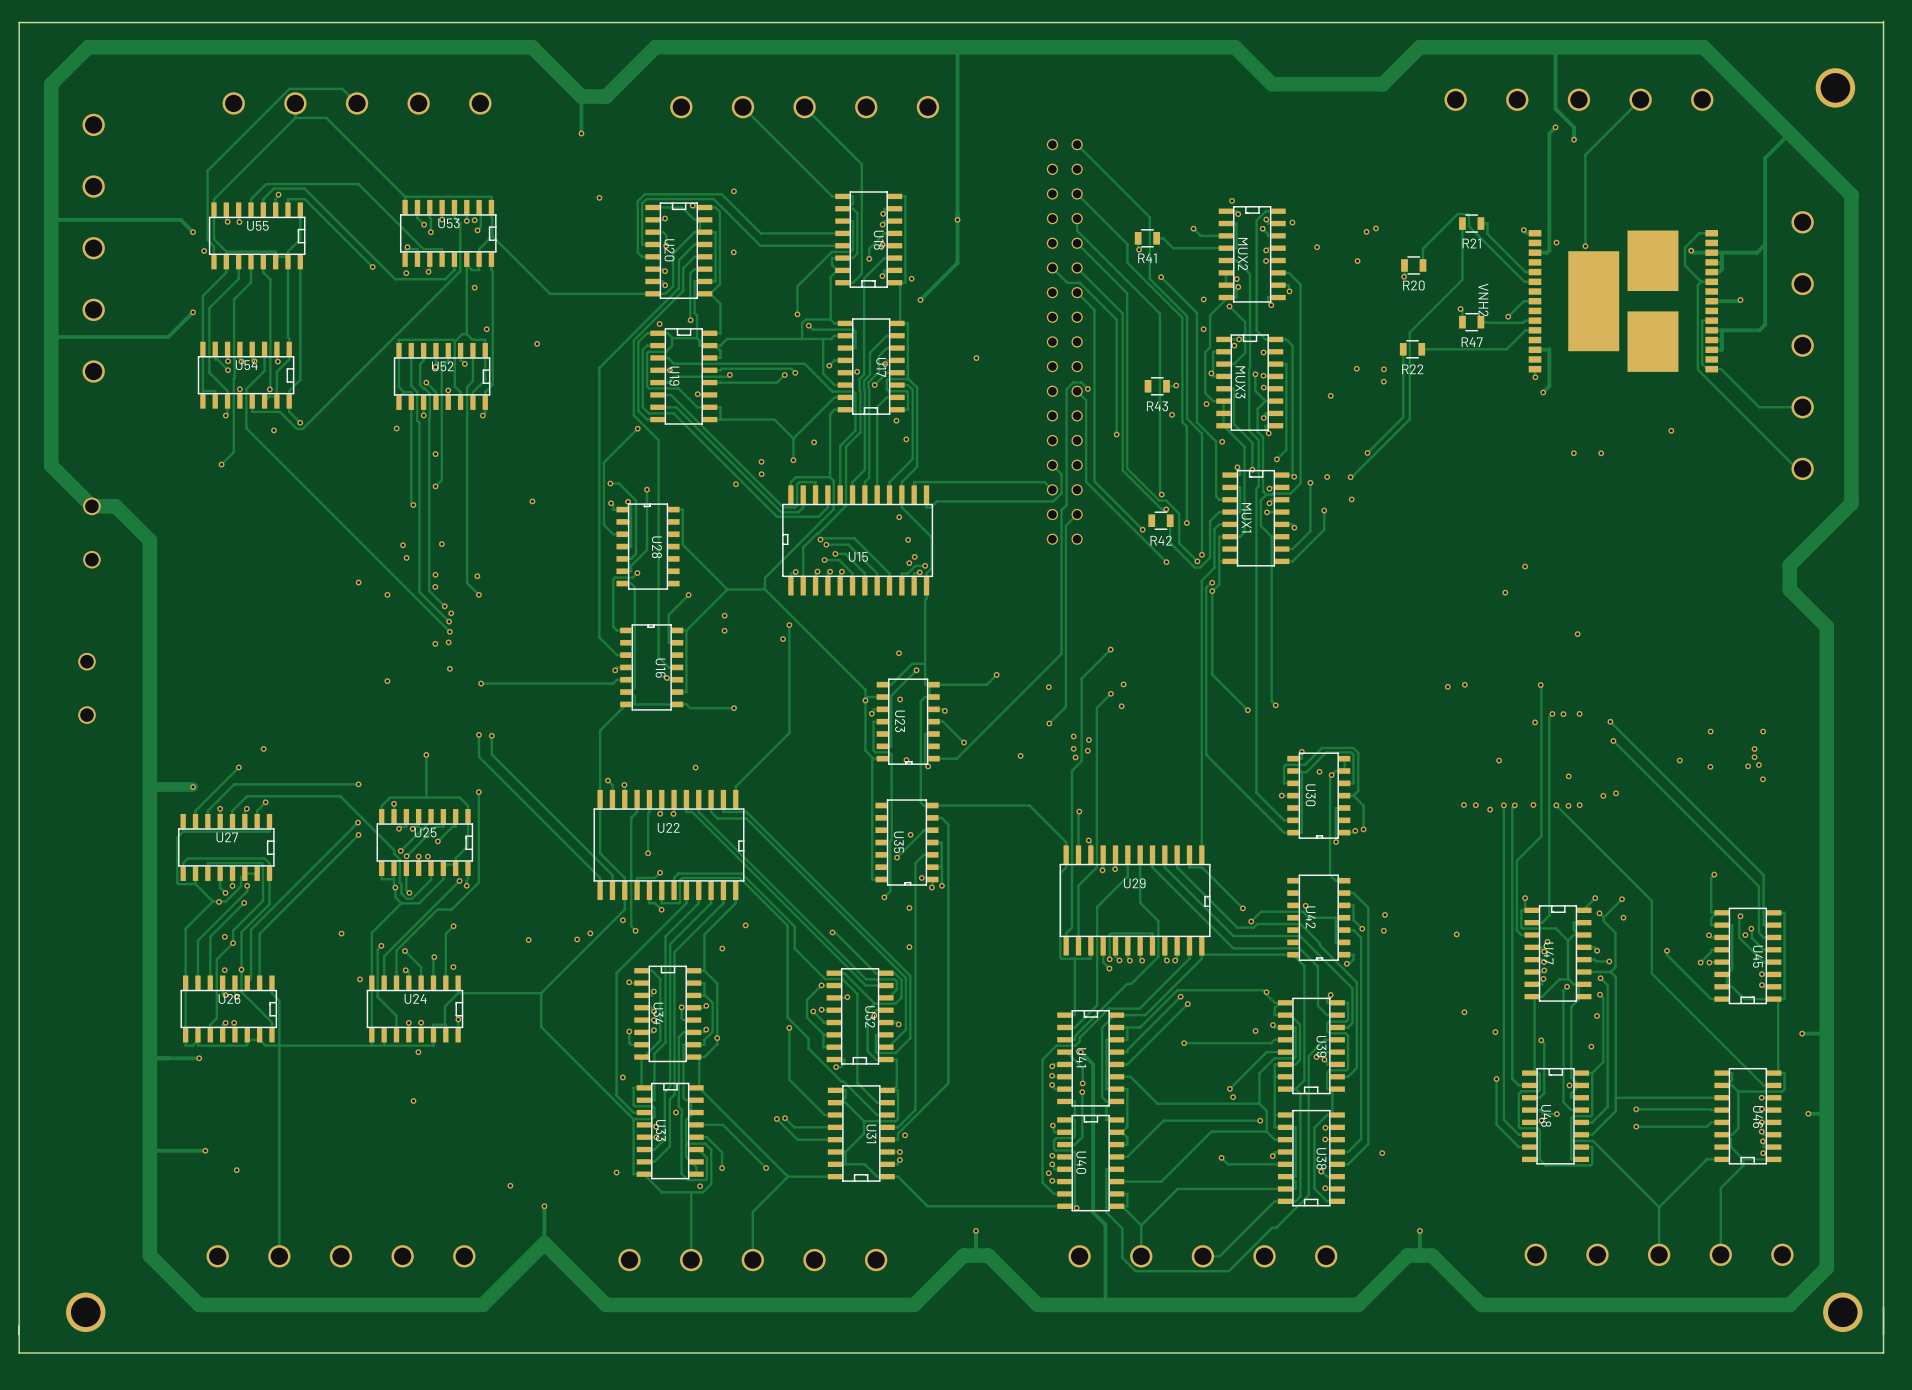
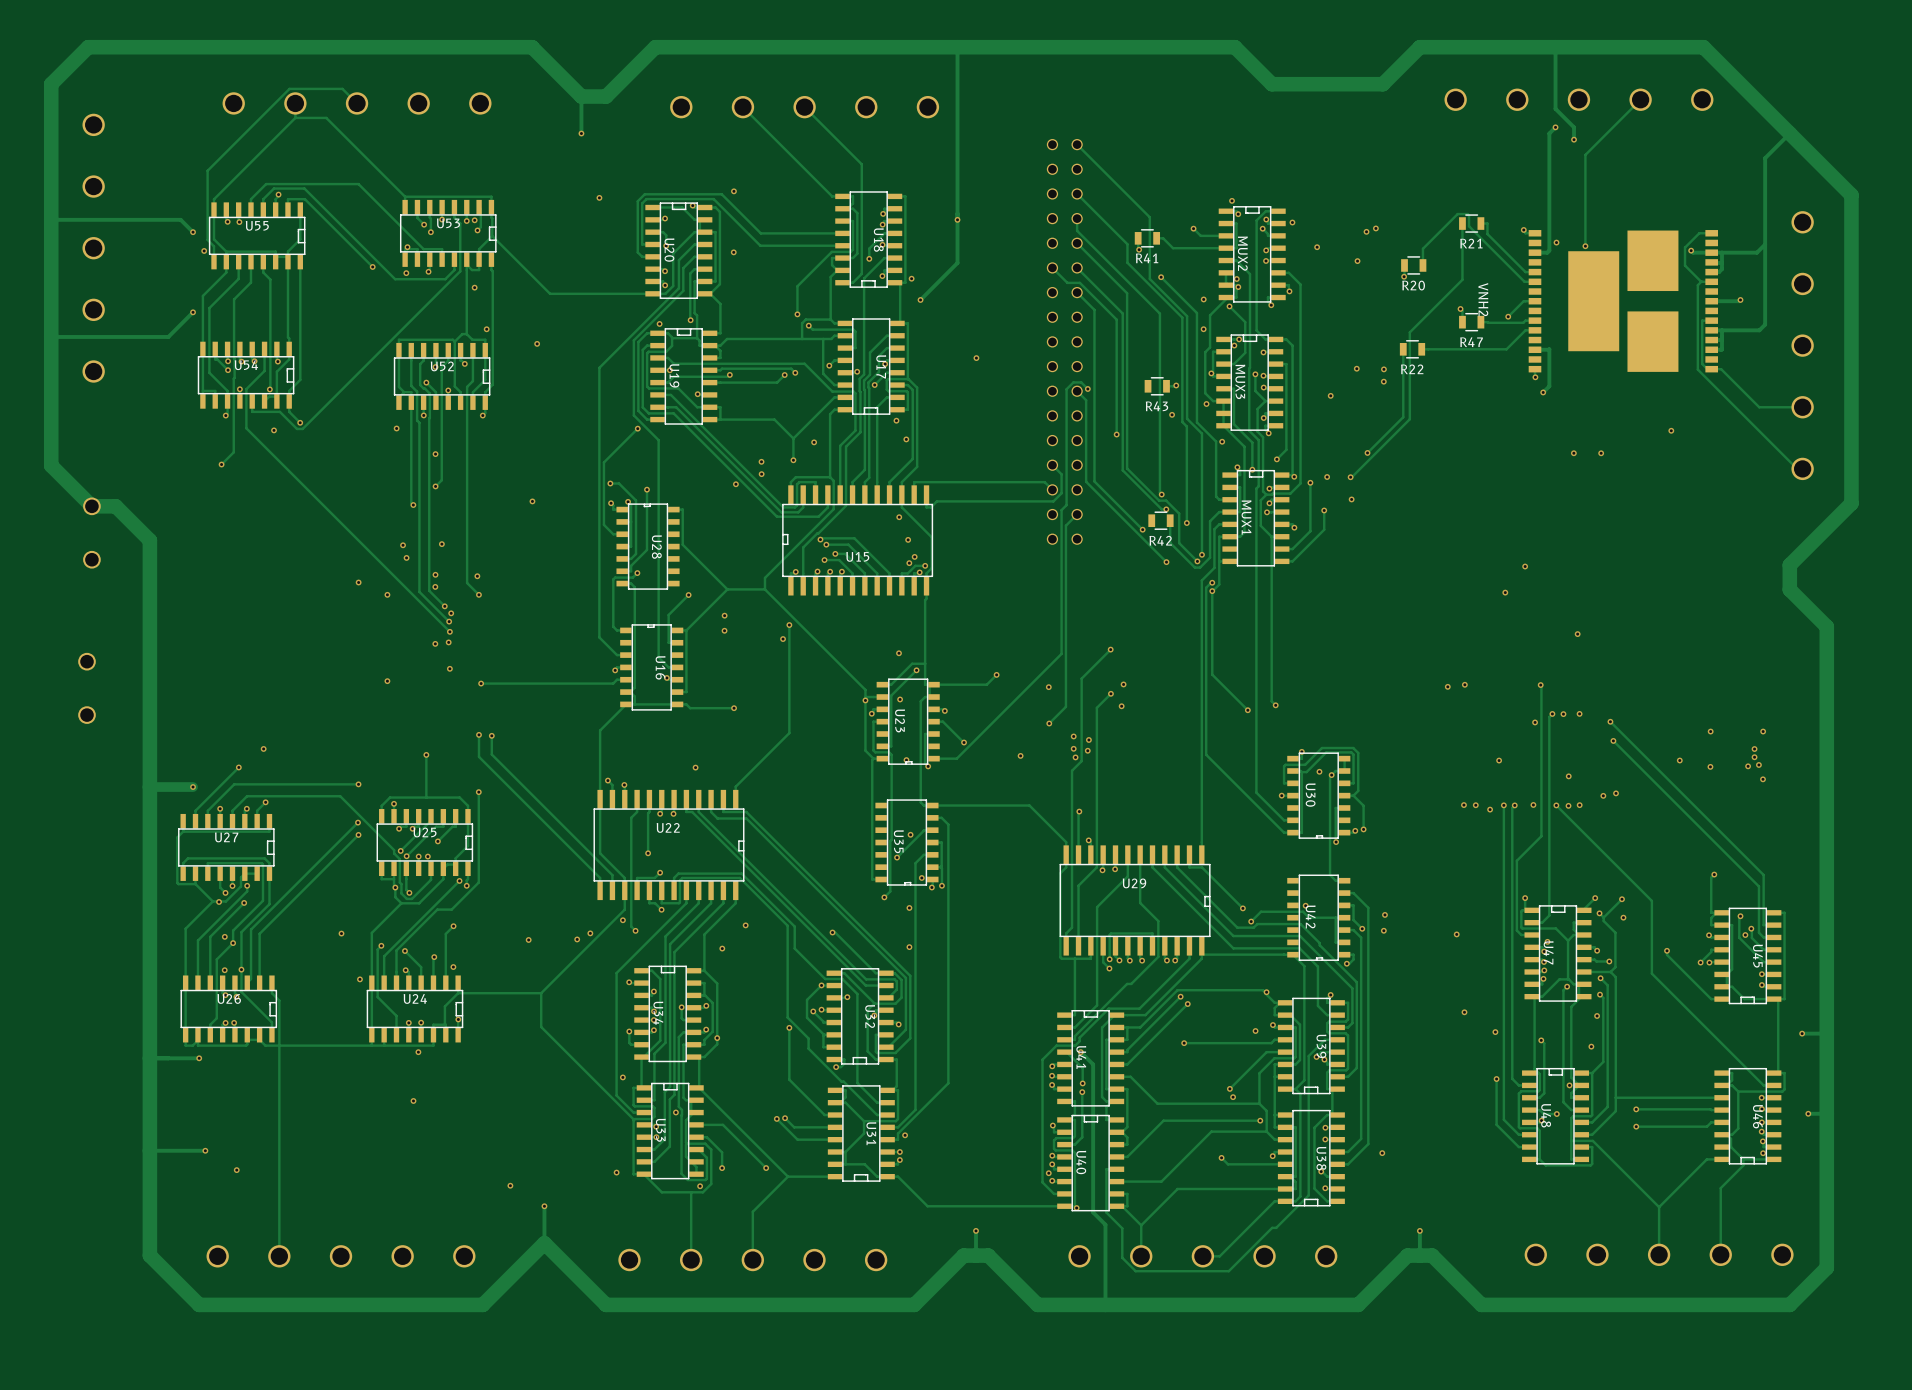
board edge: (1883, 21) (1883, 1352) (19, 1352) (19, 22) (1883, 22) -> none
part: (1835, 87) -> none
part: (85, 1312) -> none
part: (1842, 1312) -> none

